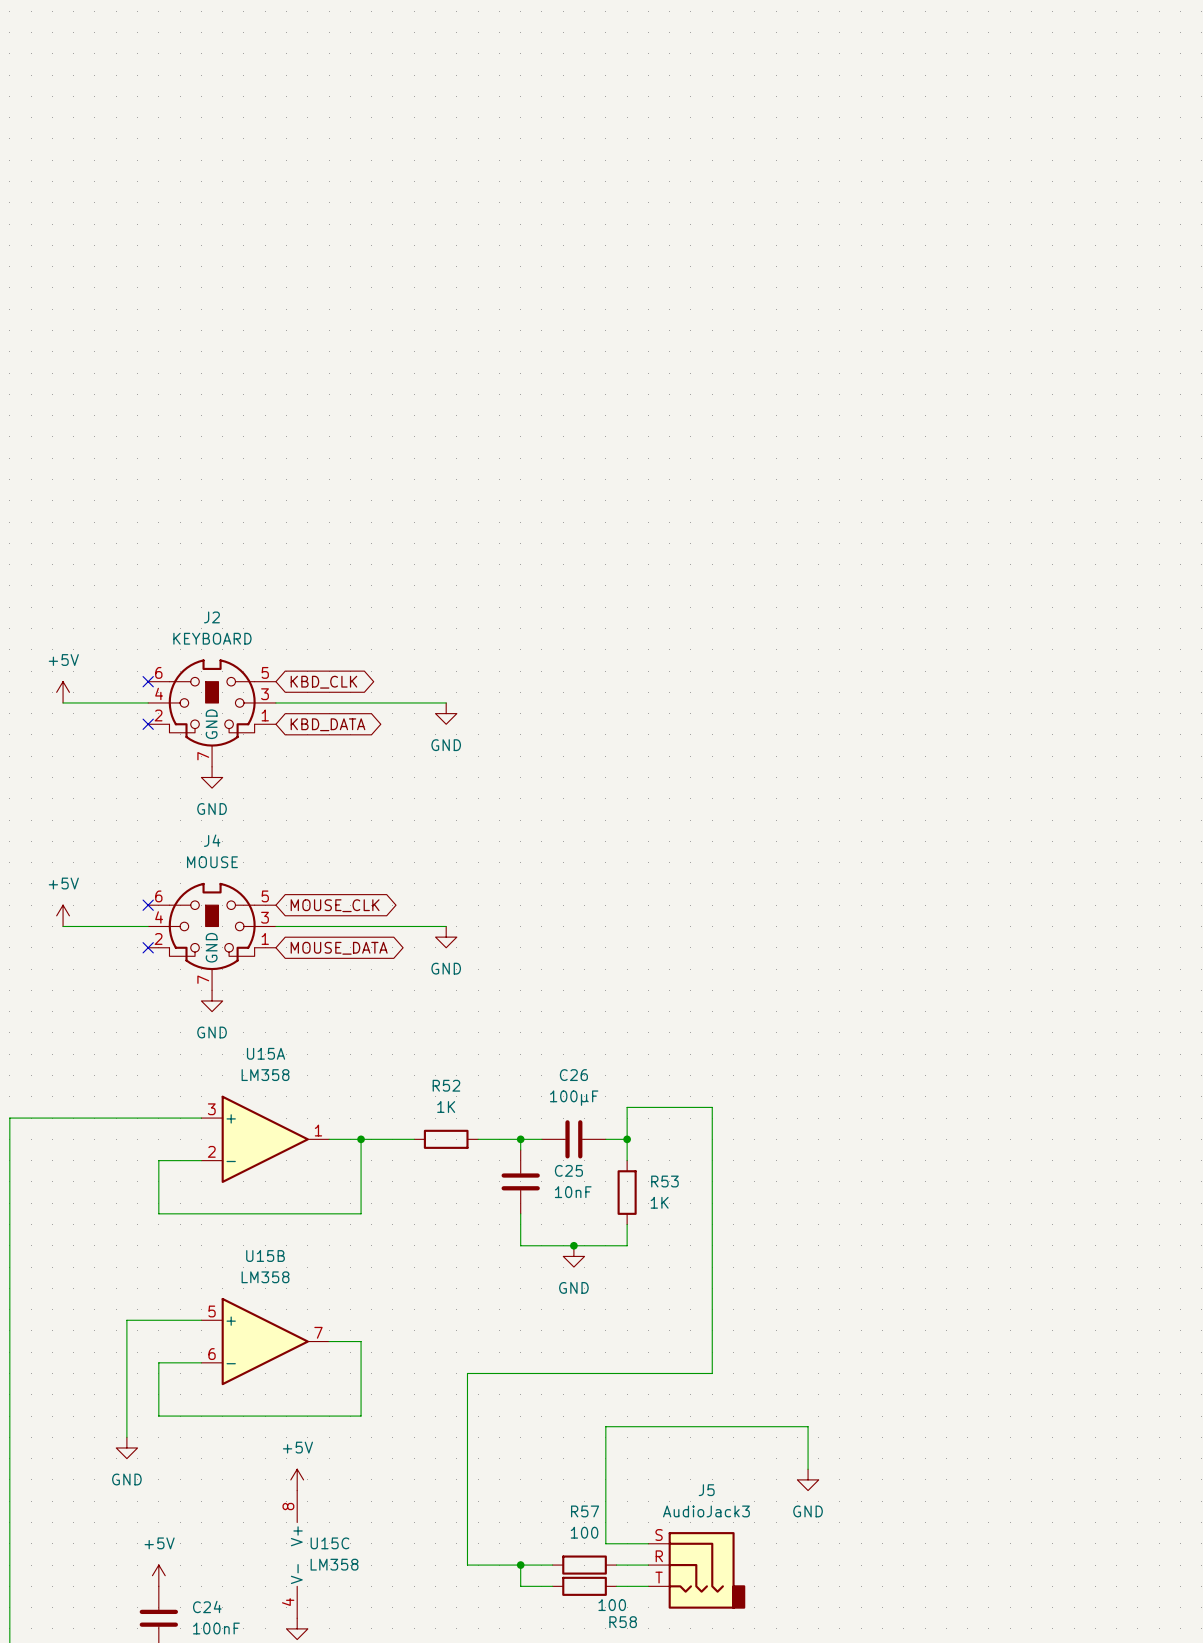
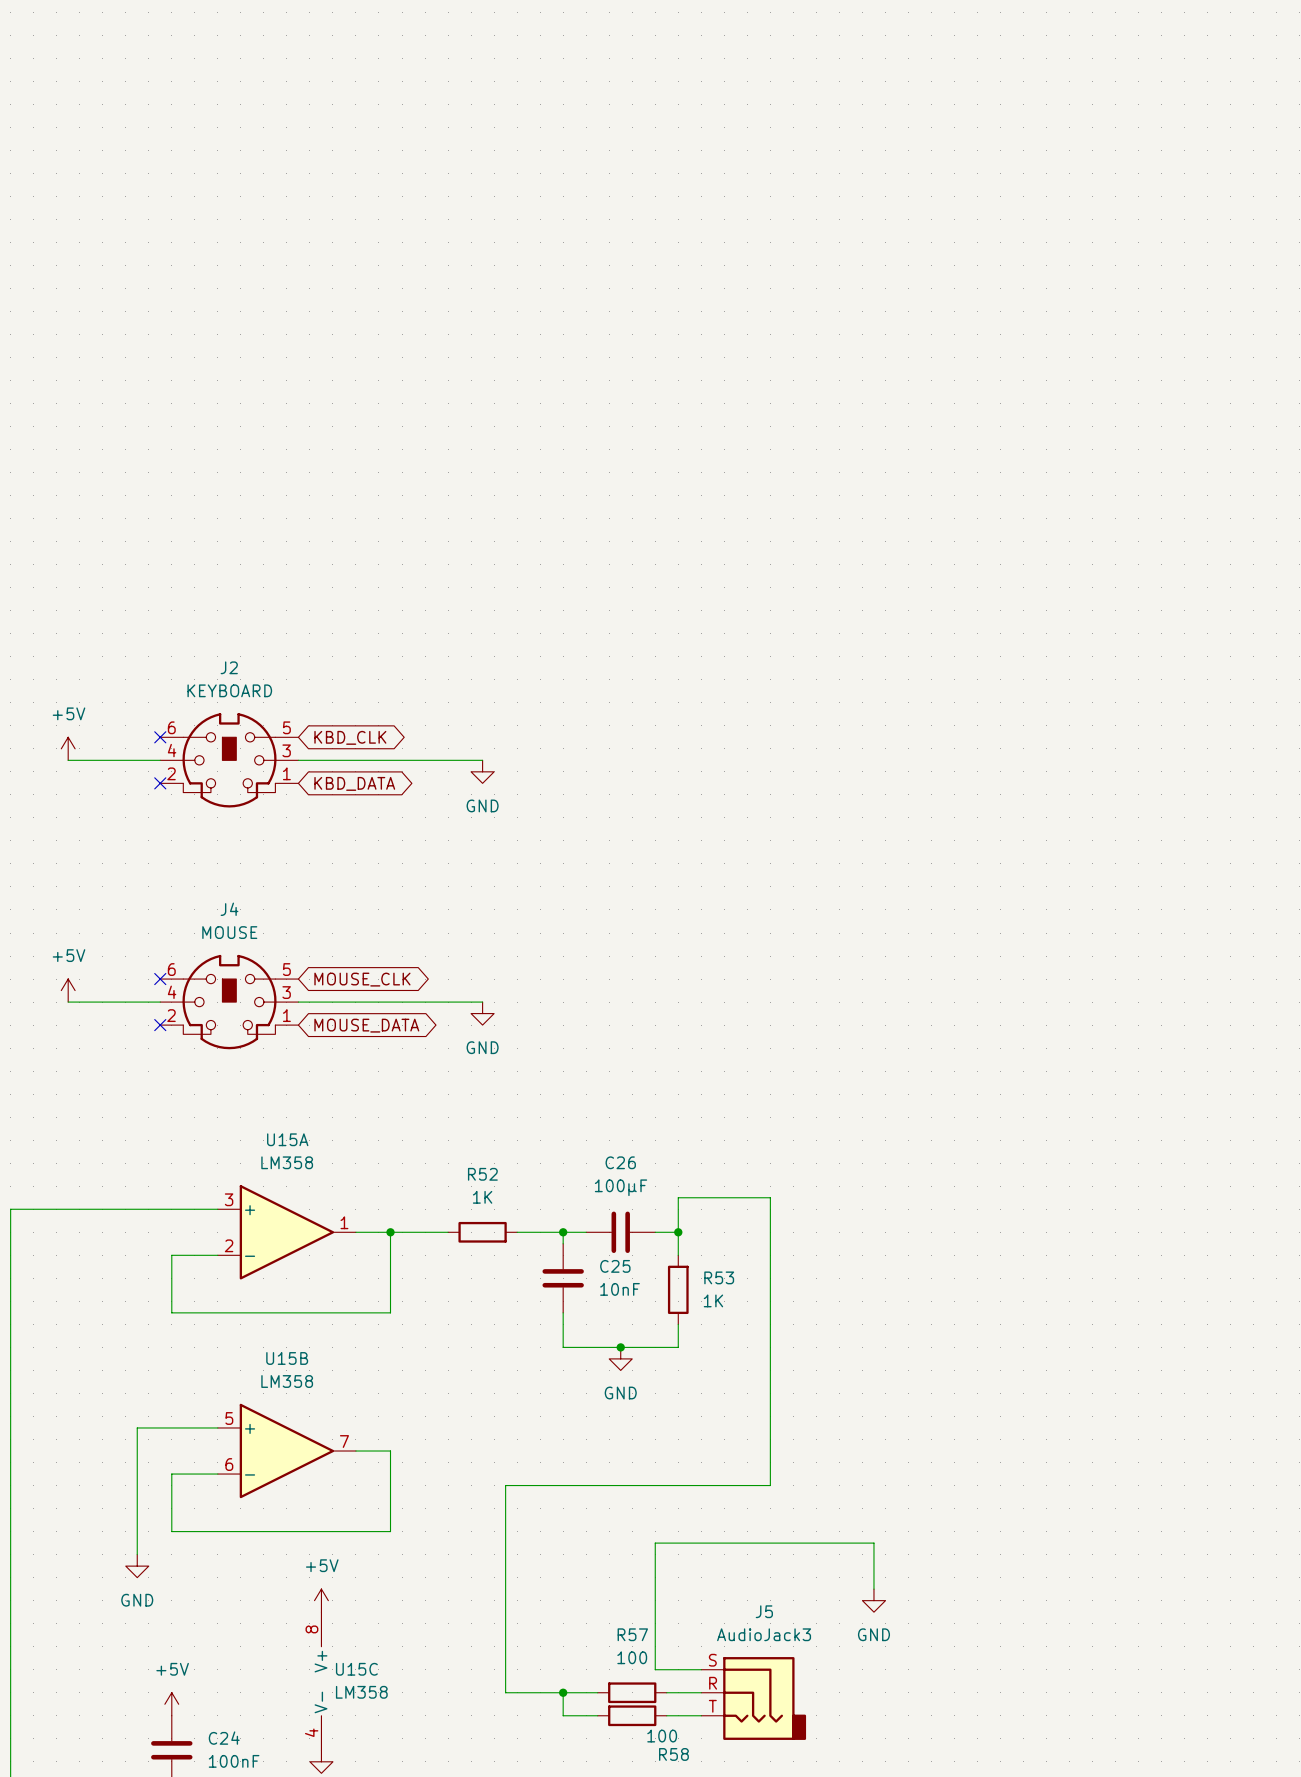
J2 symbol: [148, 659, 276, 767] -> [160, 713, 299, 808]
power symbol: GND (212, 777) -> none
J4 symbol: [148, 882, 276, 991] -> [160, 954, 299, 1050]
power symbol: GND (212, 1000) -> none

